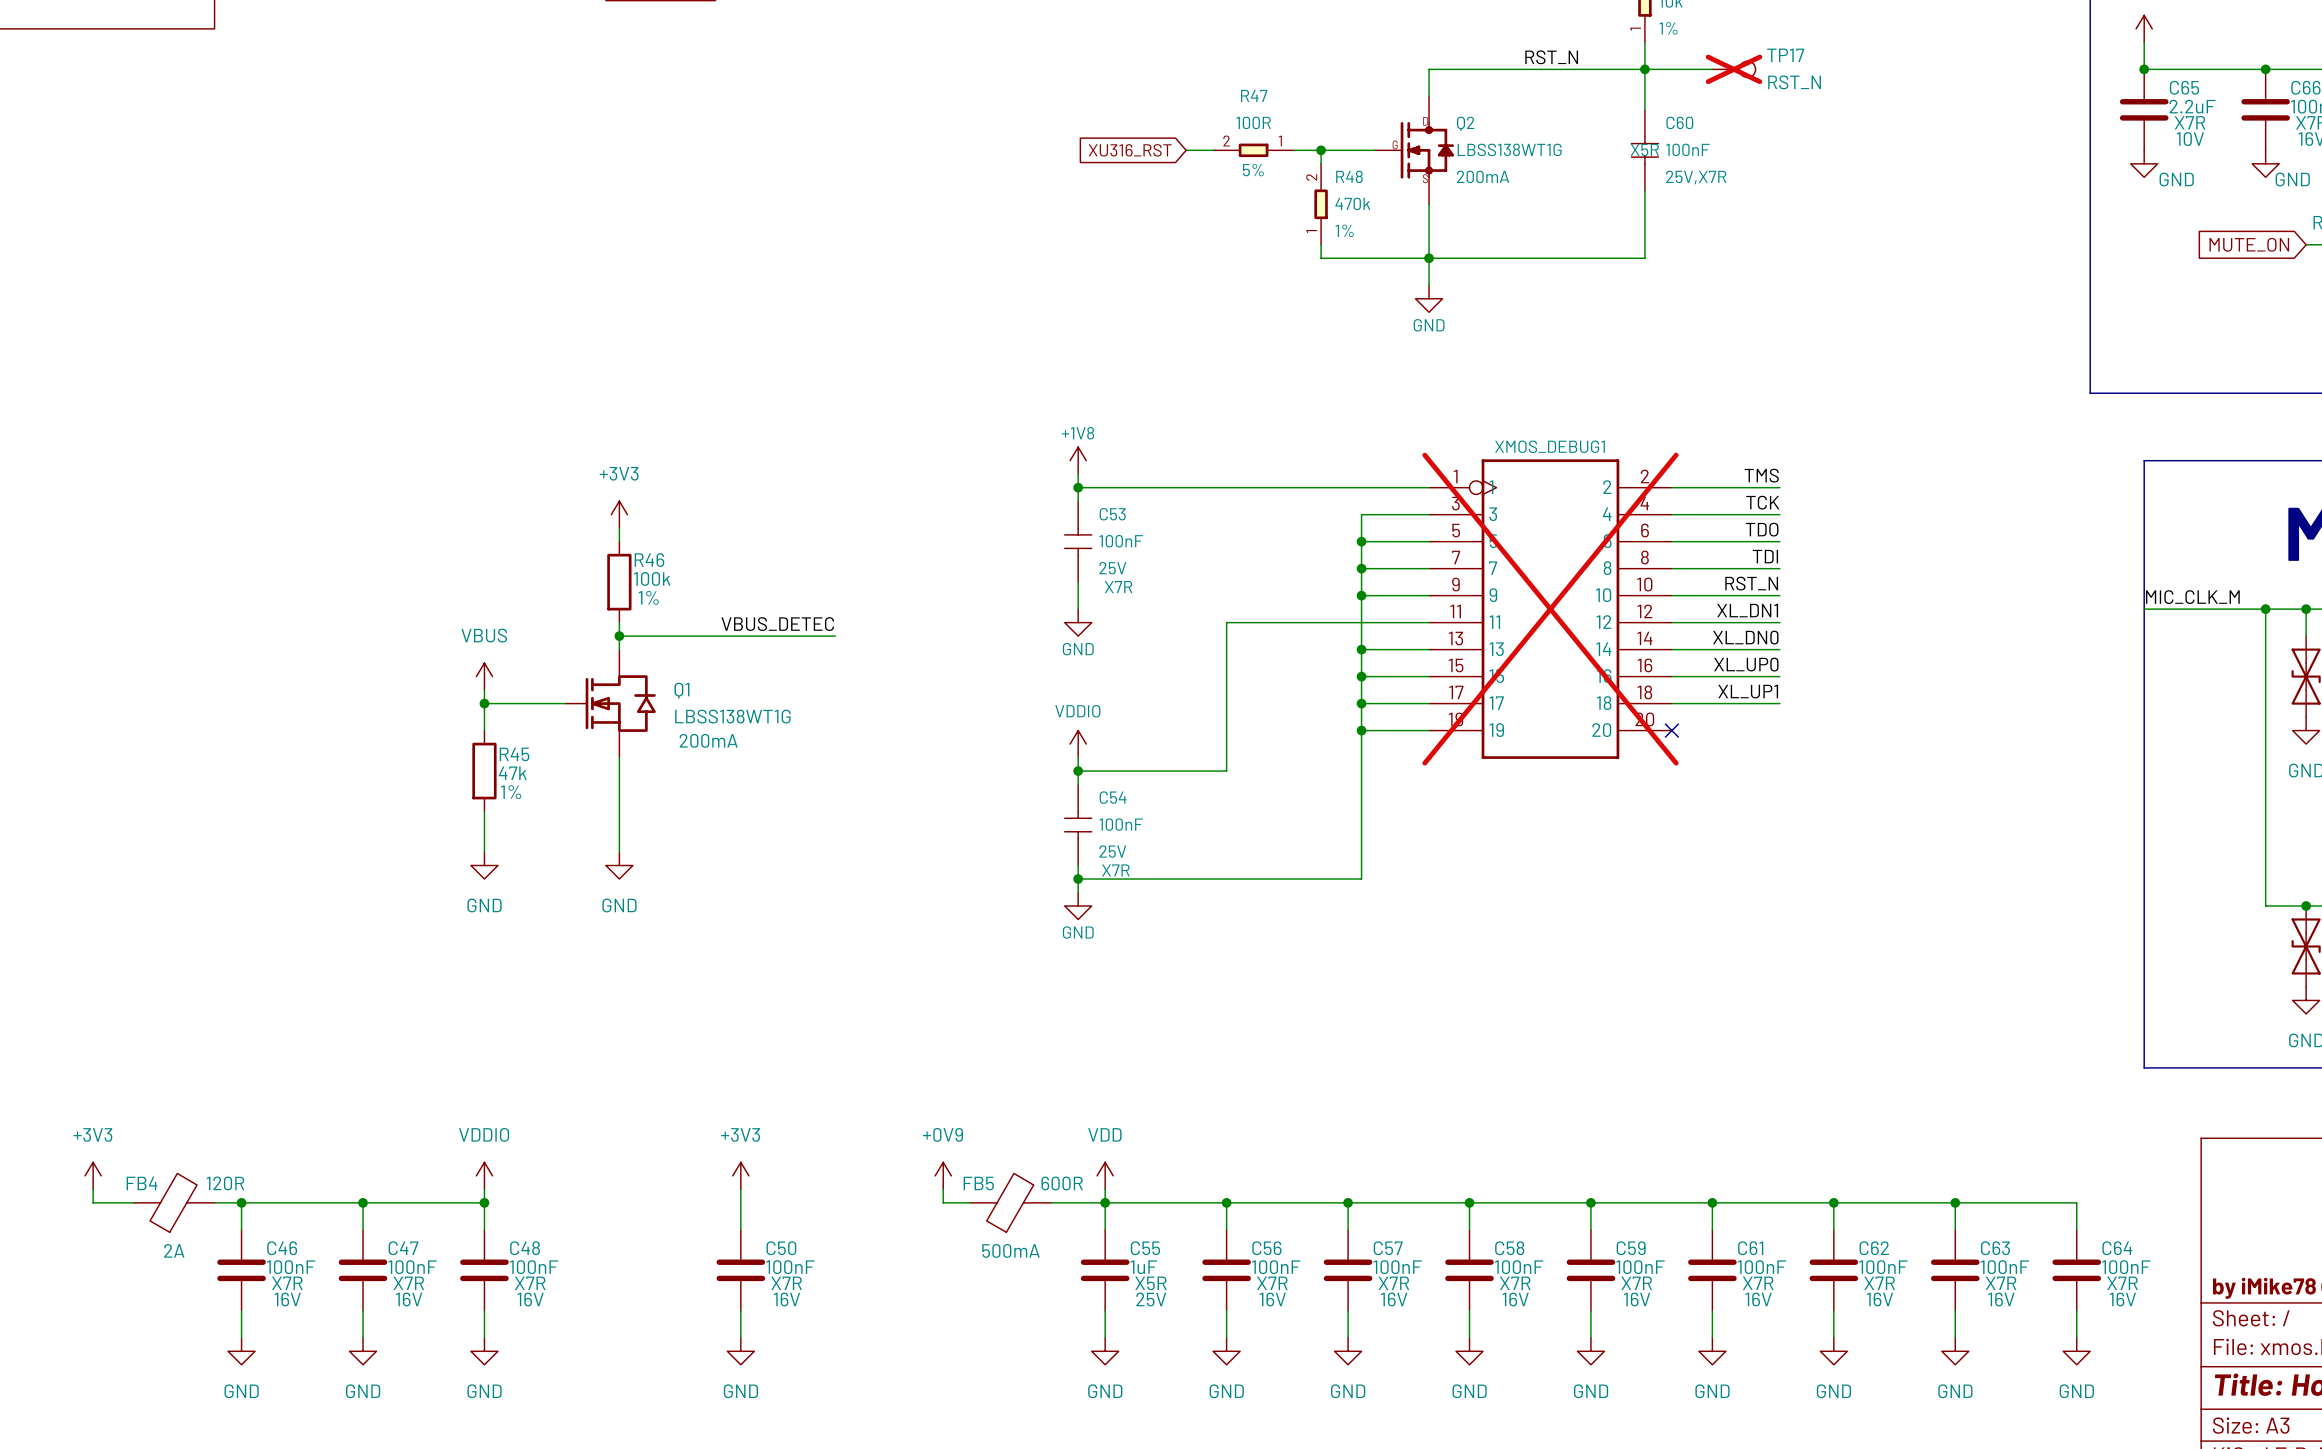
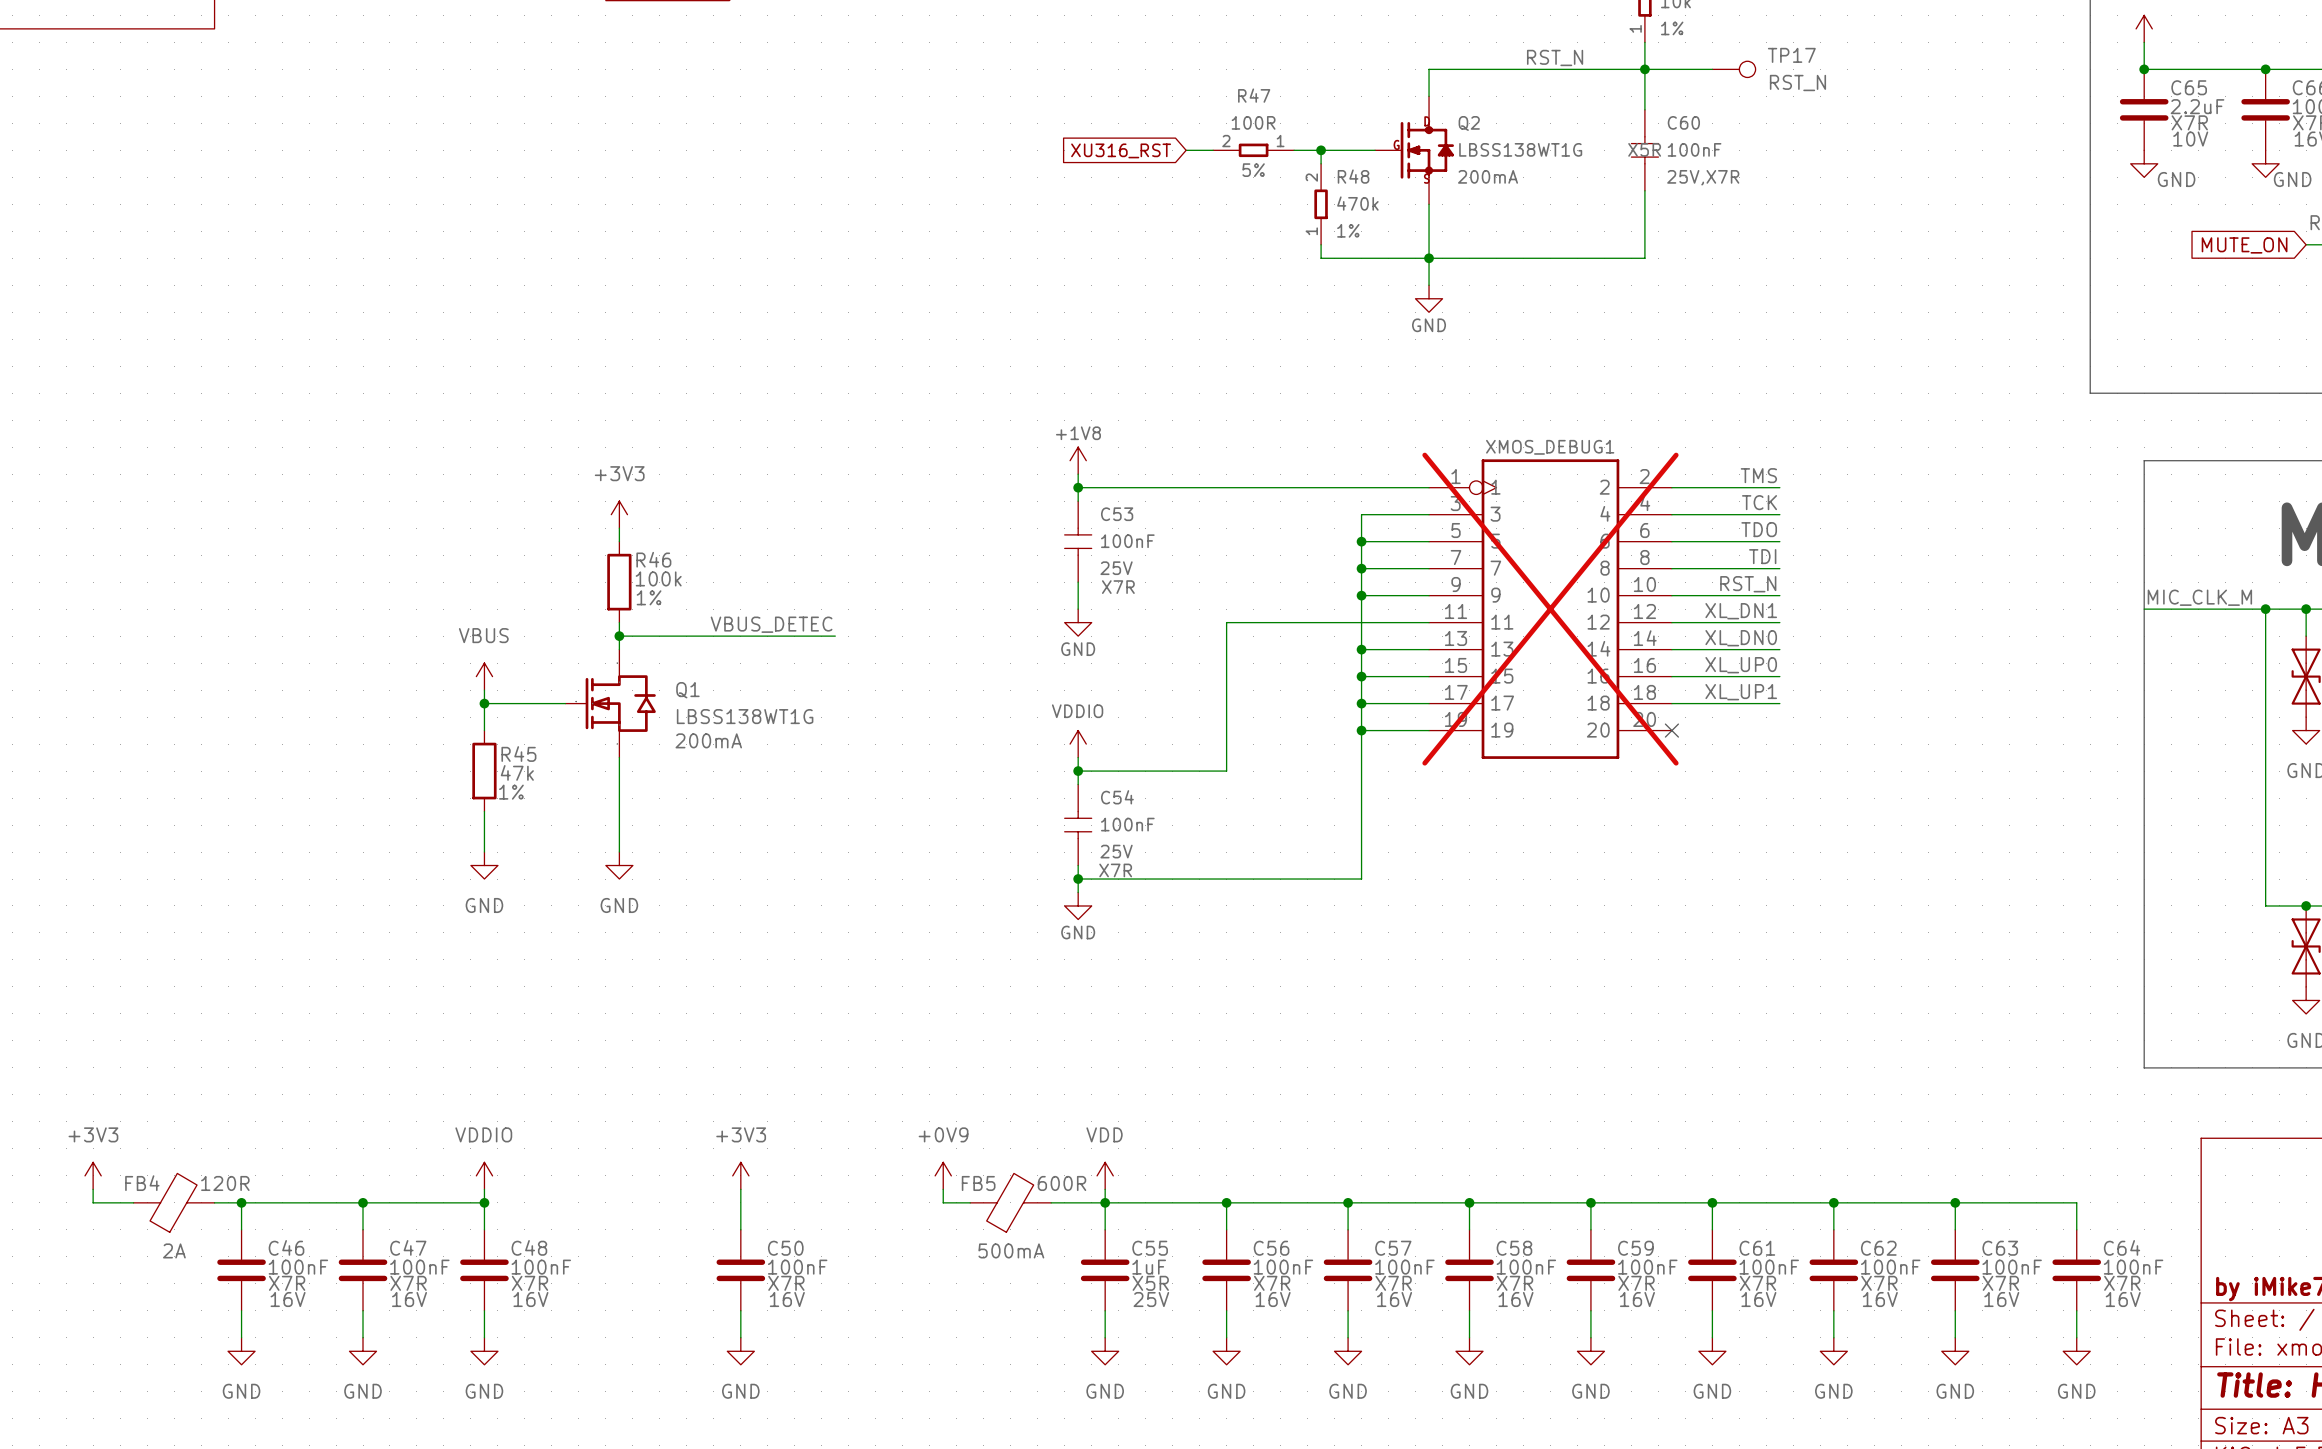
TP17 do-not-place cross: (1733, 69) -> none

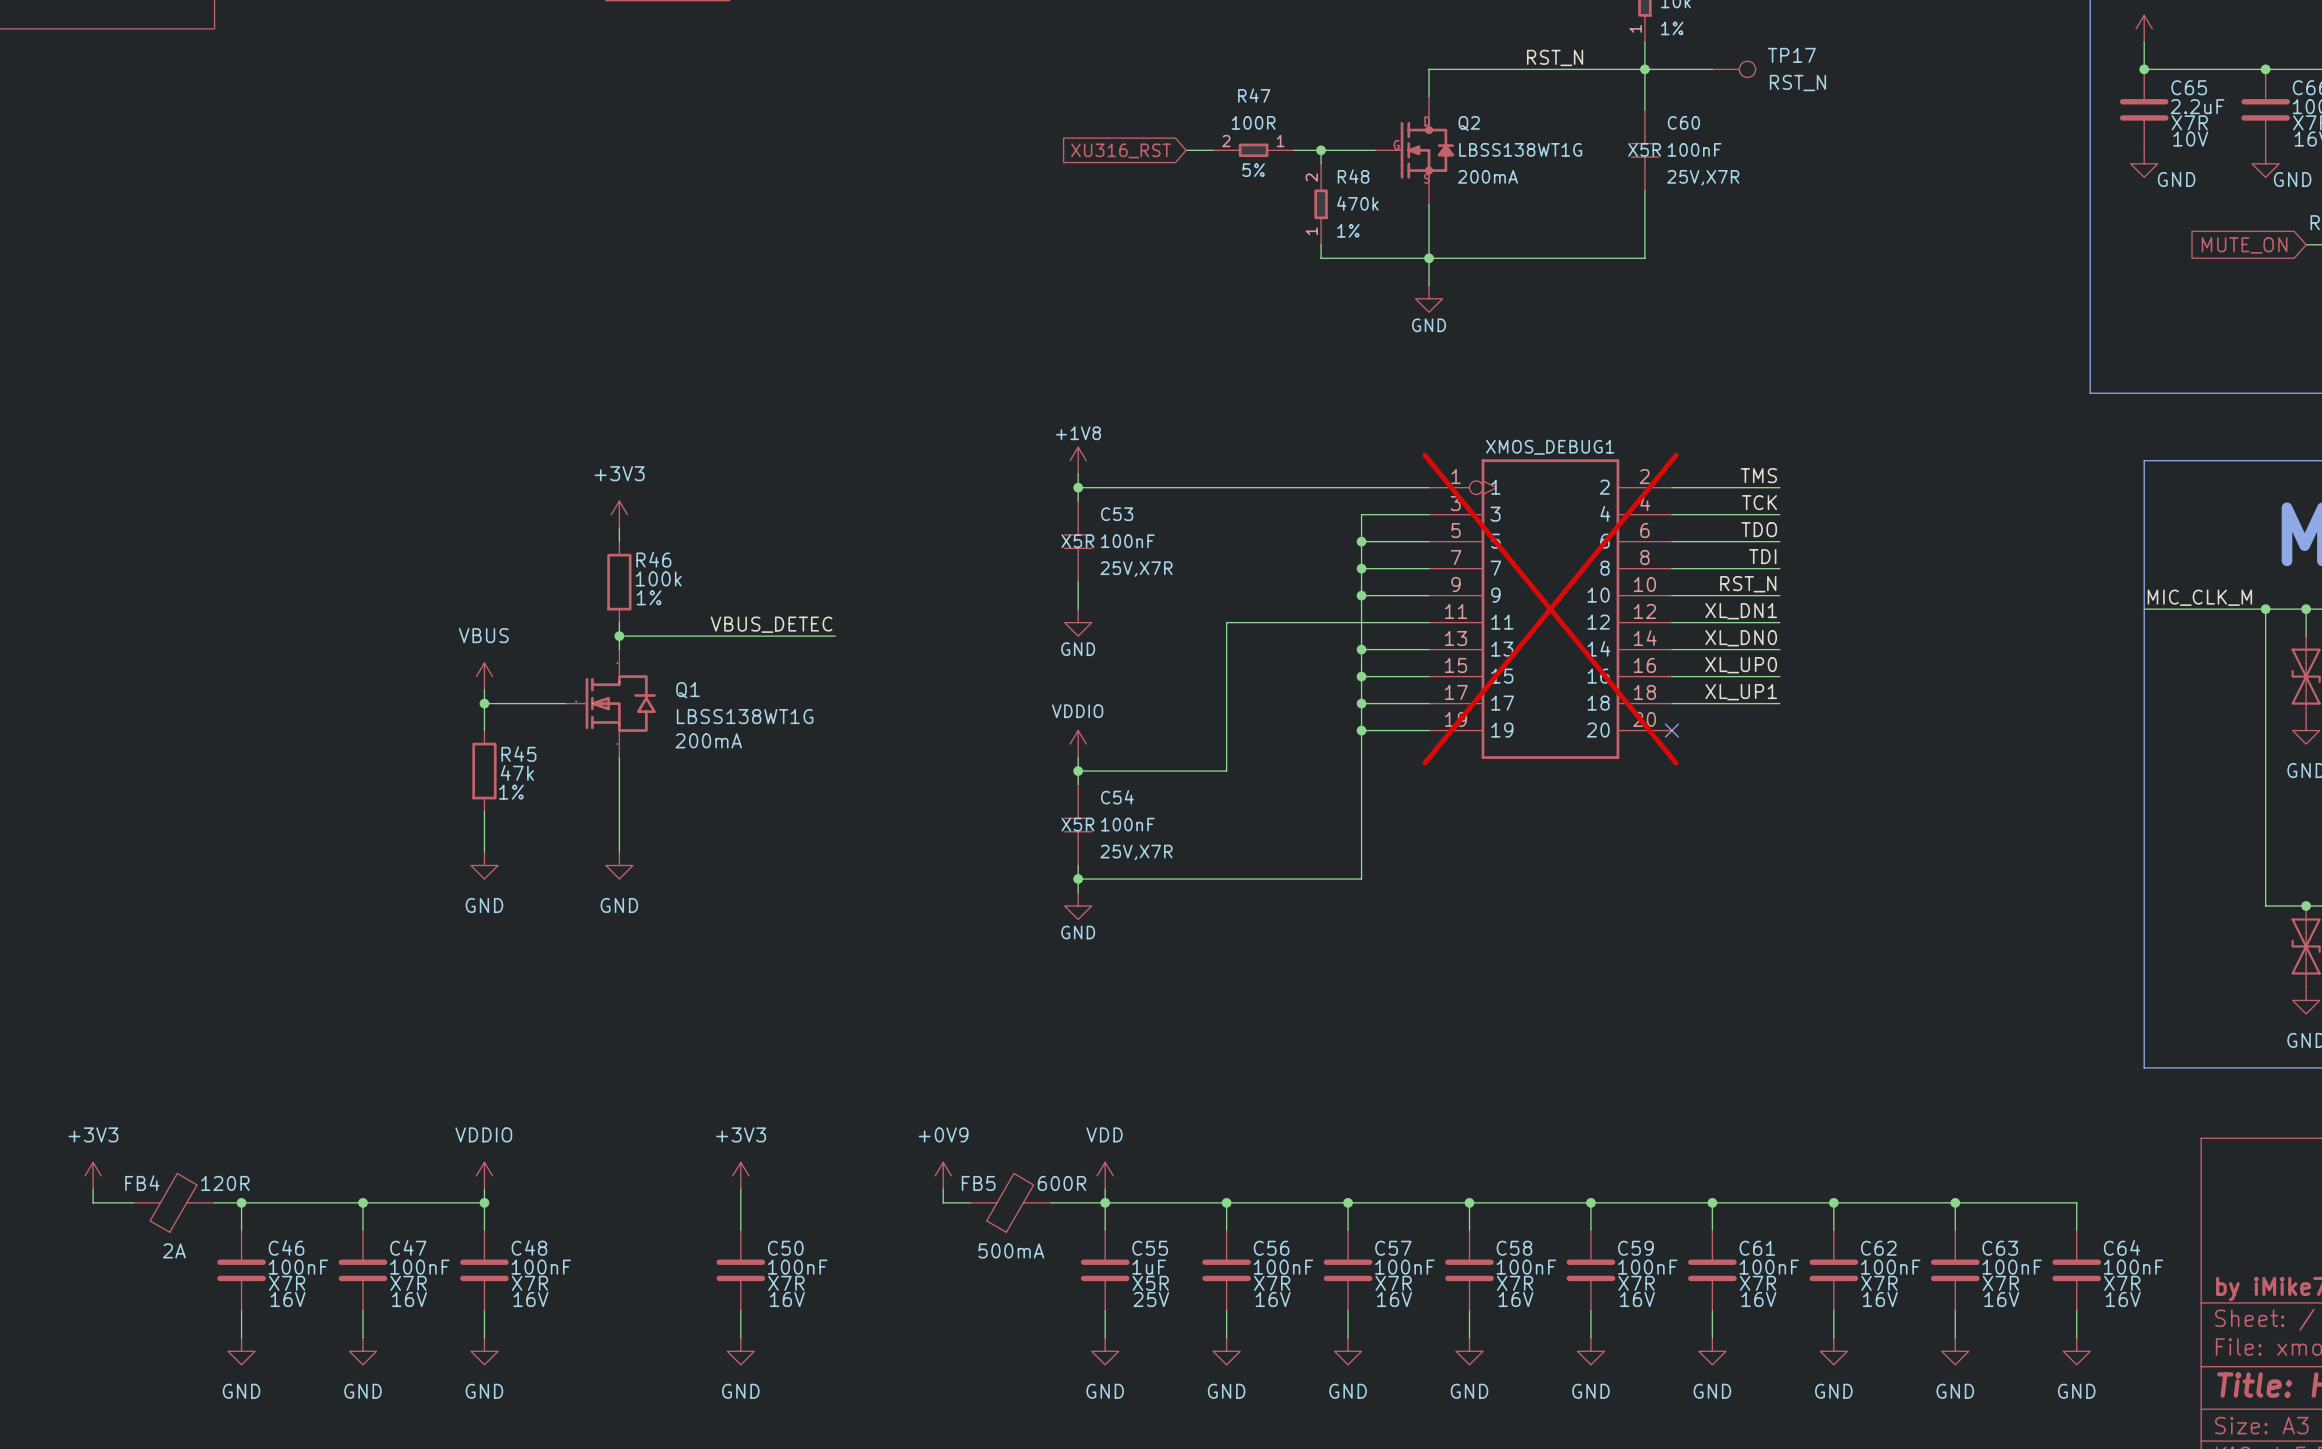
C53 text: 25V (1116, 568) -> 25V,X7R (1136, 569)
C53 text: X7R (1118, 587) -> X5R (1077, 541)
C54 text: 25V (1116, 851) -> 25V,X7R (1136, 852)
C54 text: X7R (1115, 870) -> X5R (1077, 824)

